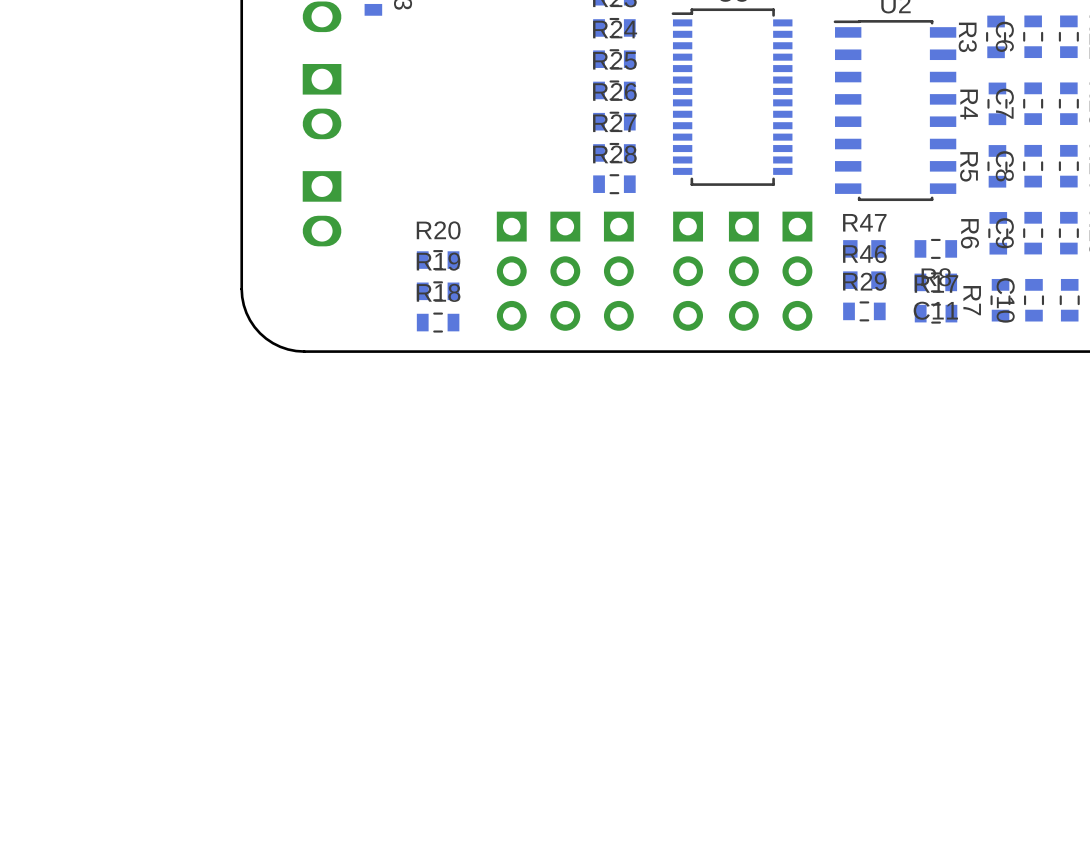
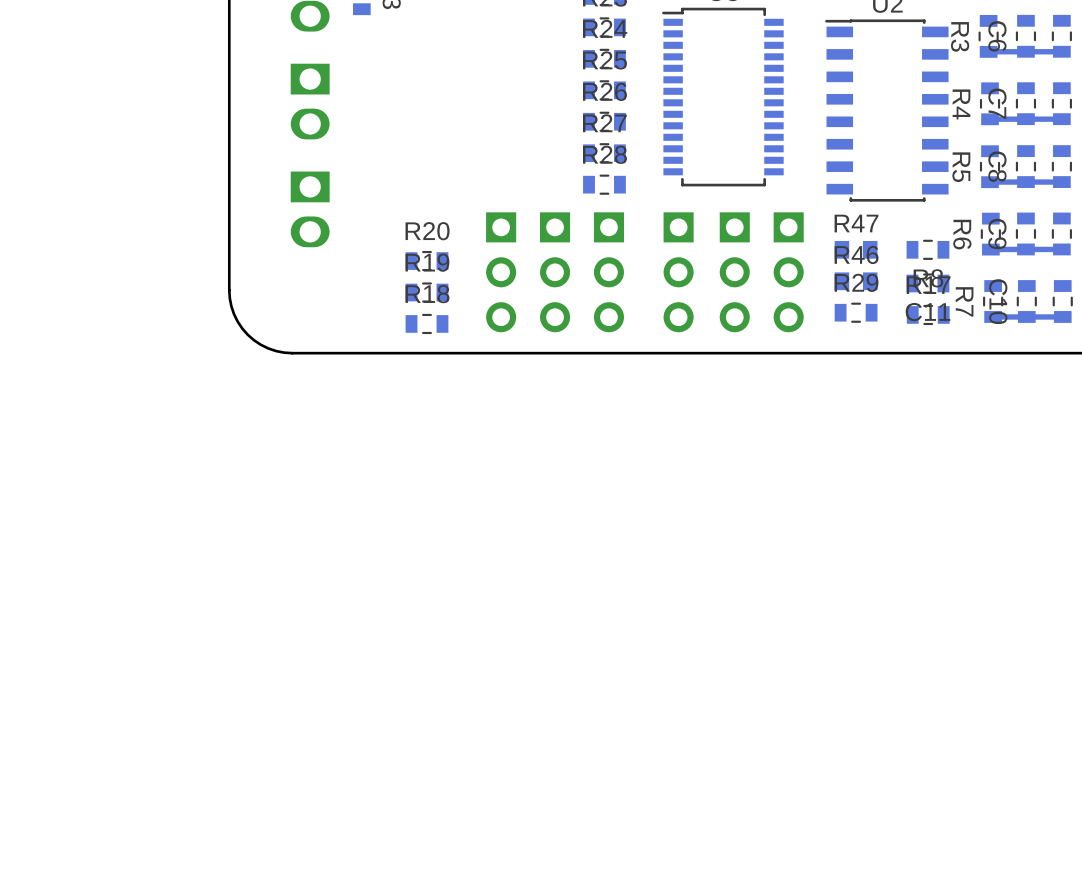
track: none -> (1061, 51) (988, 51)
track: none -> (1061, 119) (990, 119)
track: none -> (1061, 182) (990, 182)
track: none -> (1061, 249) (990, 249)
track: none -> (1062, 316) (993, 316)

